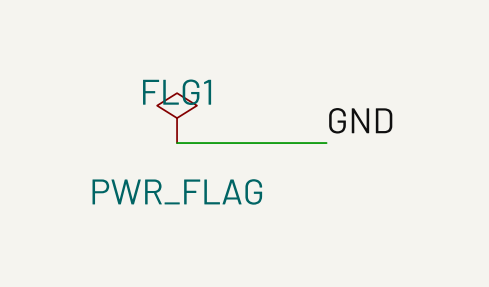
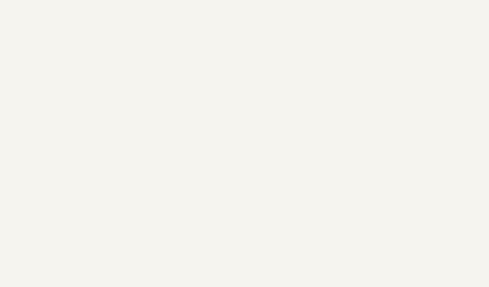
FLG1: PWR_FLAG (177, 118) -> none
label: GND (360, 120) -> none
wire: (177, 143) (326, 143) -> none

